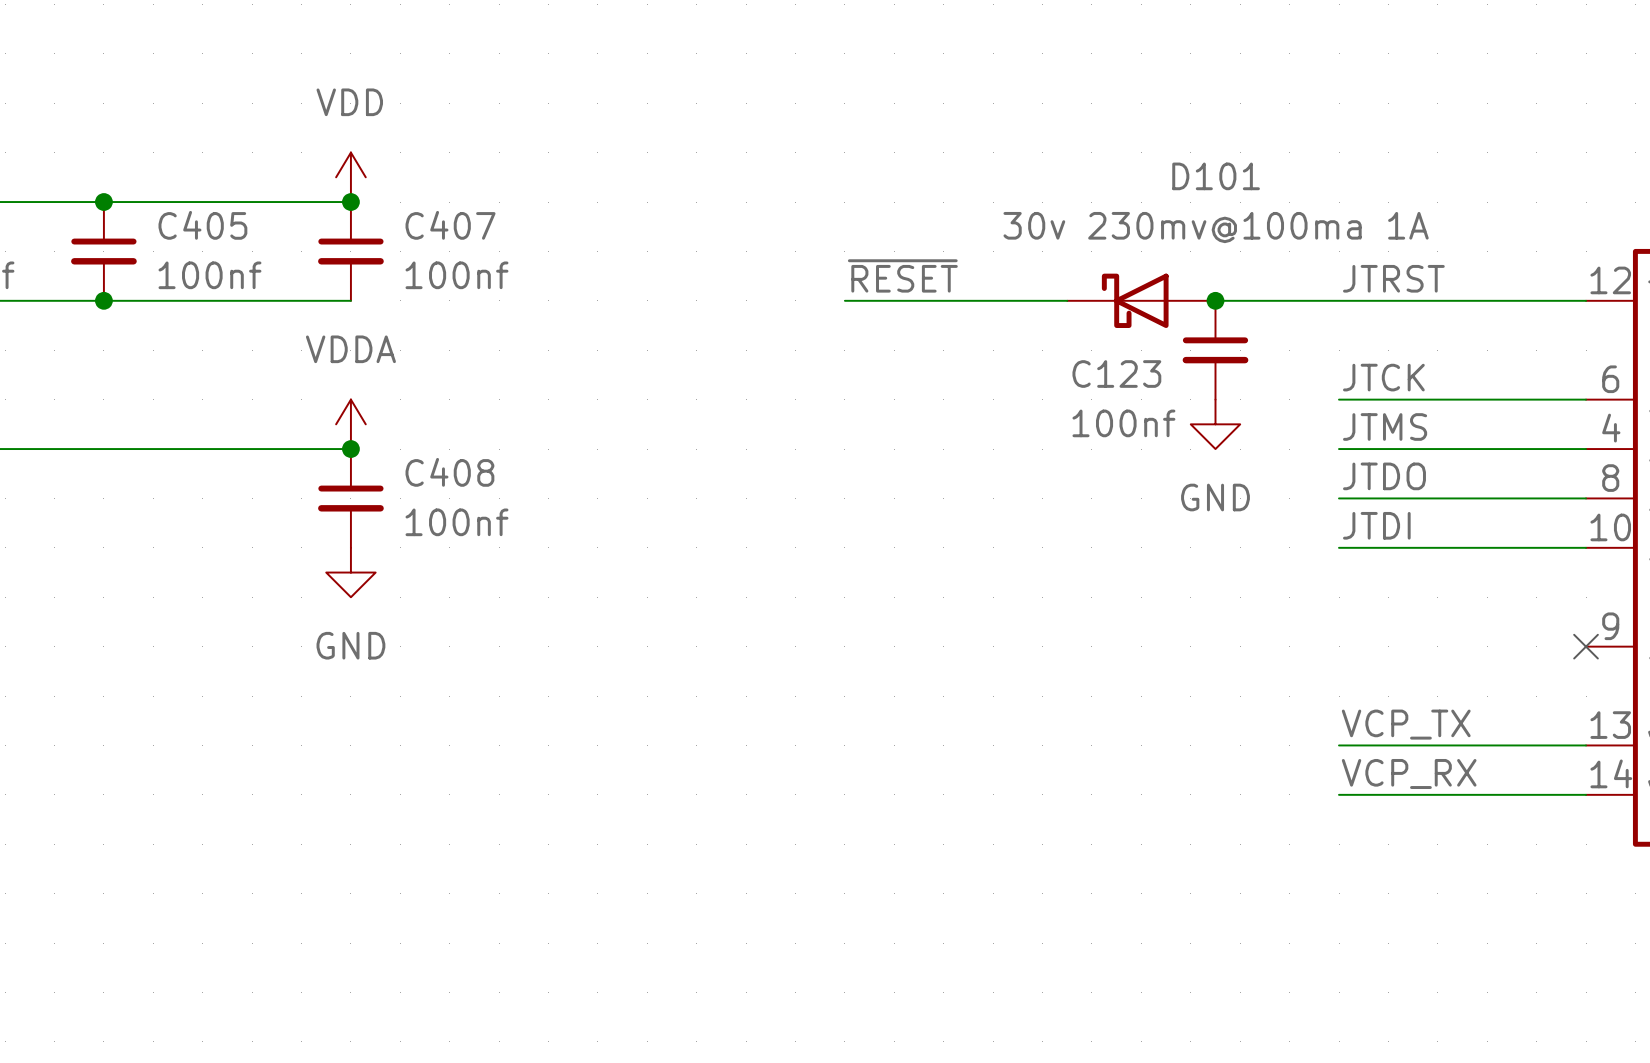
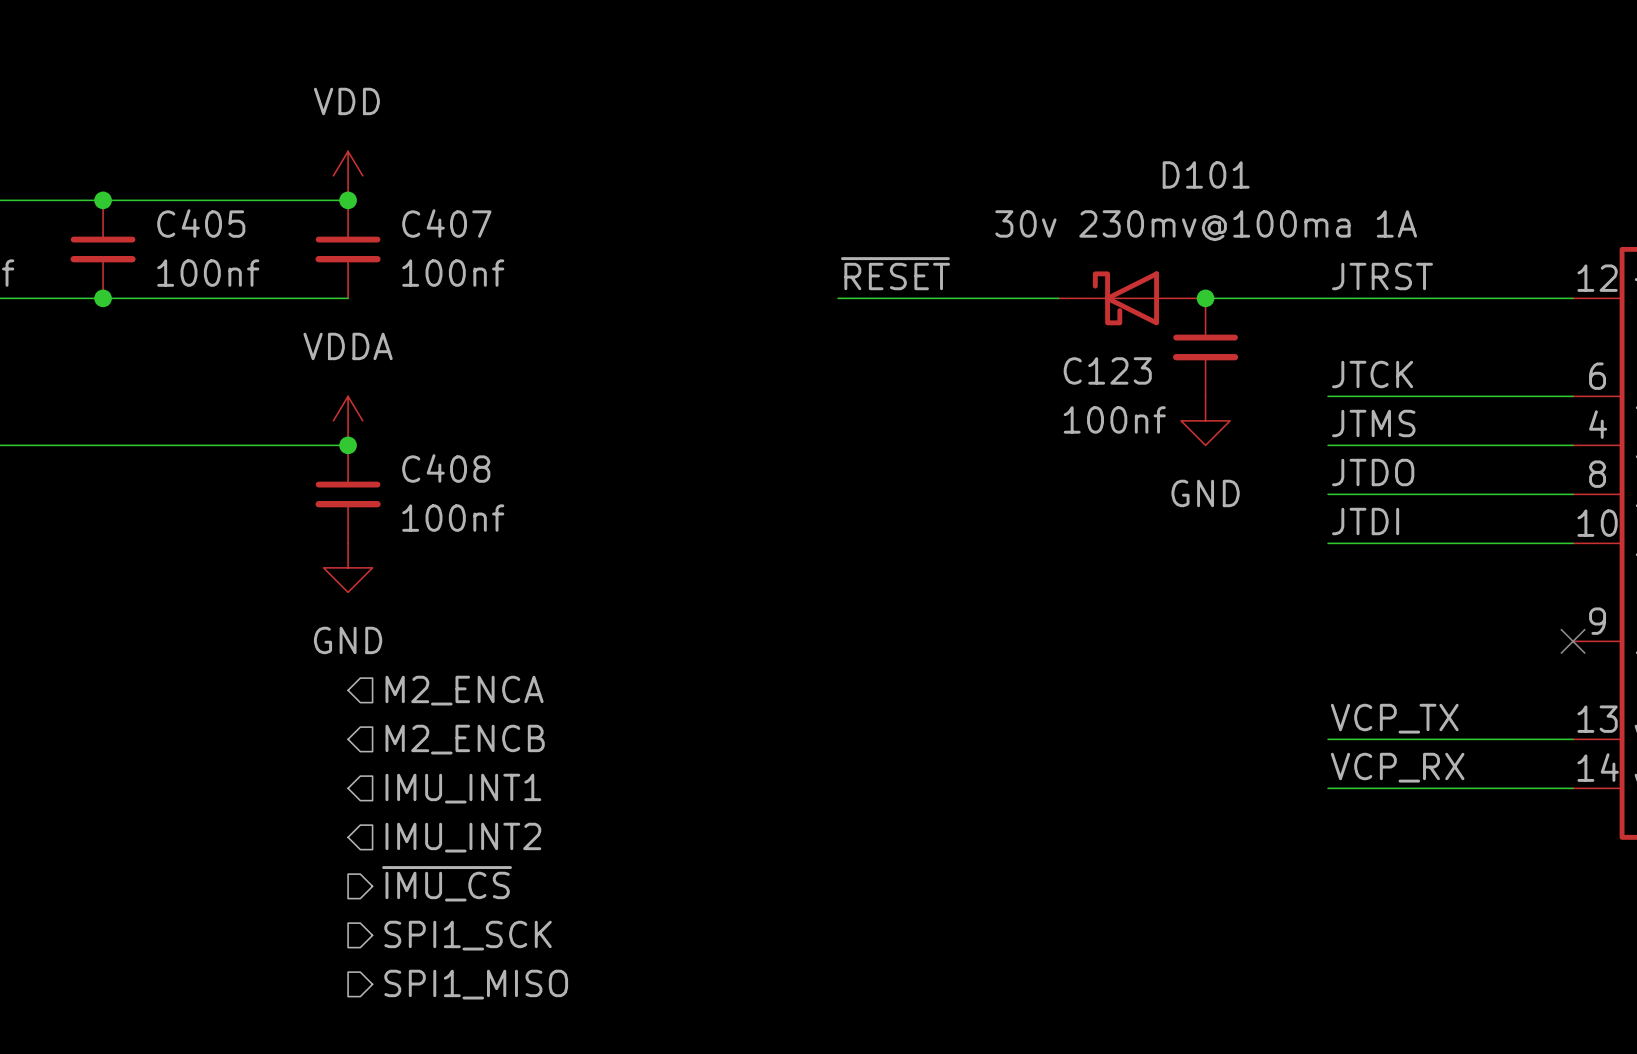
hierarchical label: none -> M2_ENCA (464, 690)
hierarchical label: none -> M2_ENCB (465, 739)
hierarchical label: none -> IMU_INT1 (463, 788)
hierarchical label: none -> IMU_INT2 (463, 837)
hierarchical label: none -> ~{IMU_CS} (447, 883)
hierarchical label: none -> SPI1_SCK (468, 935)
hierarchical label: none -> SPI1_MISO (476, 984)

